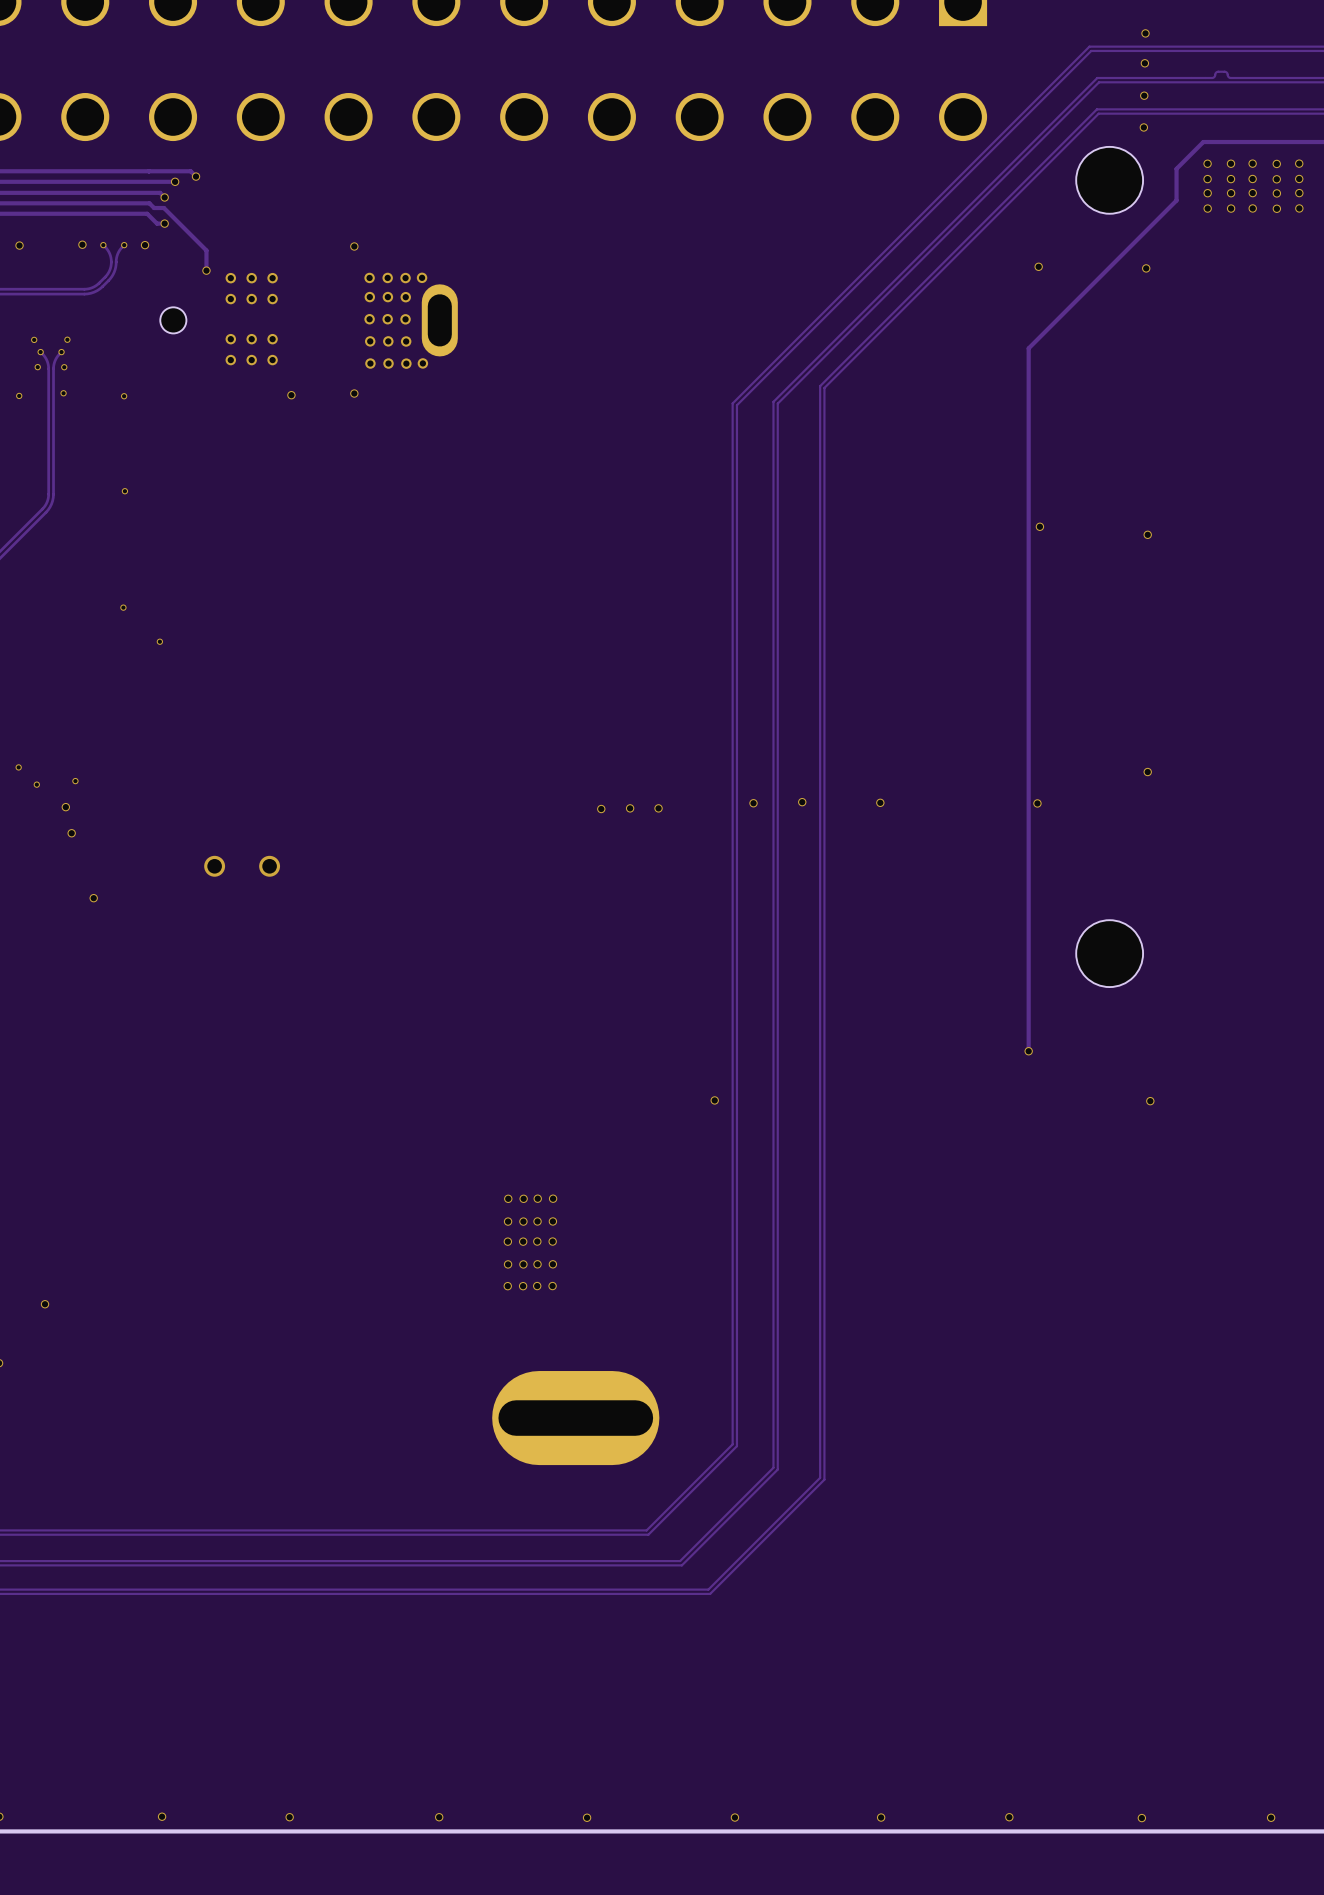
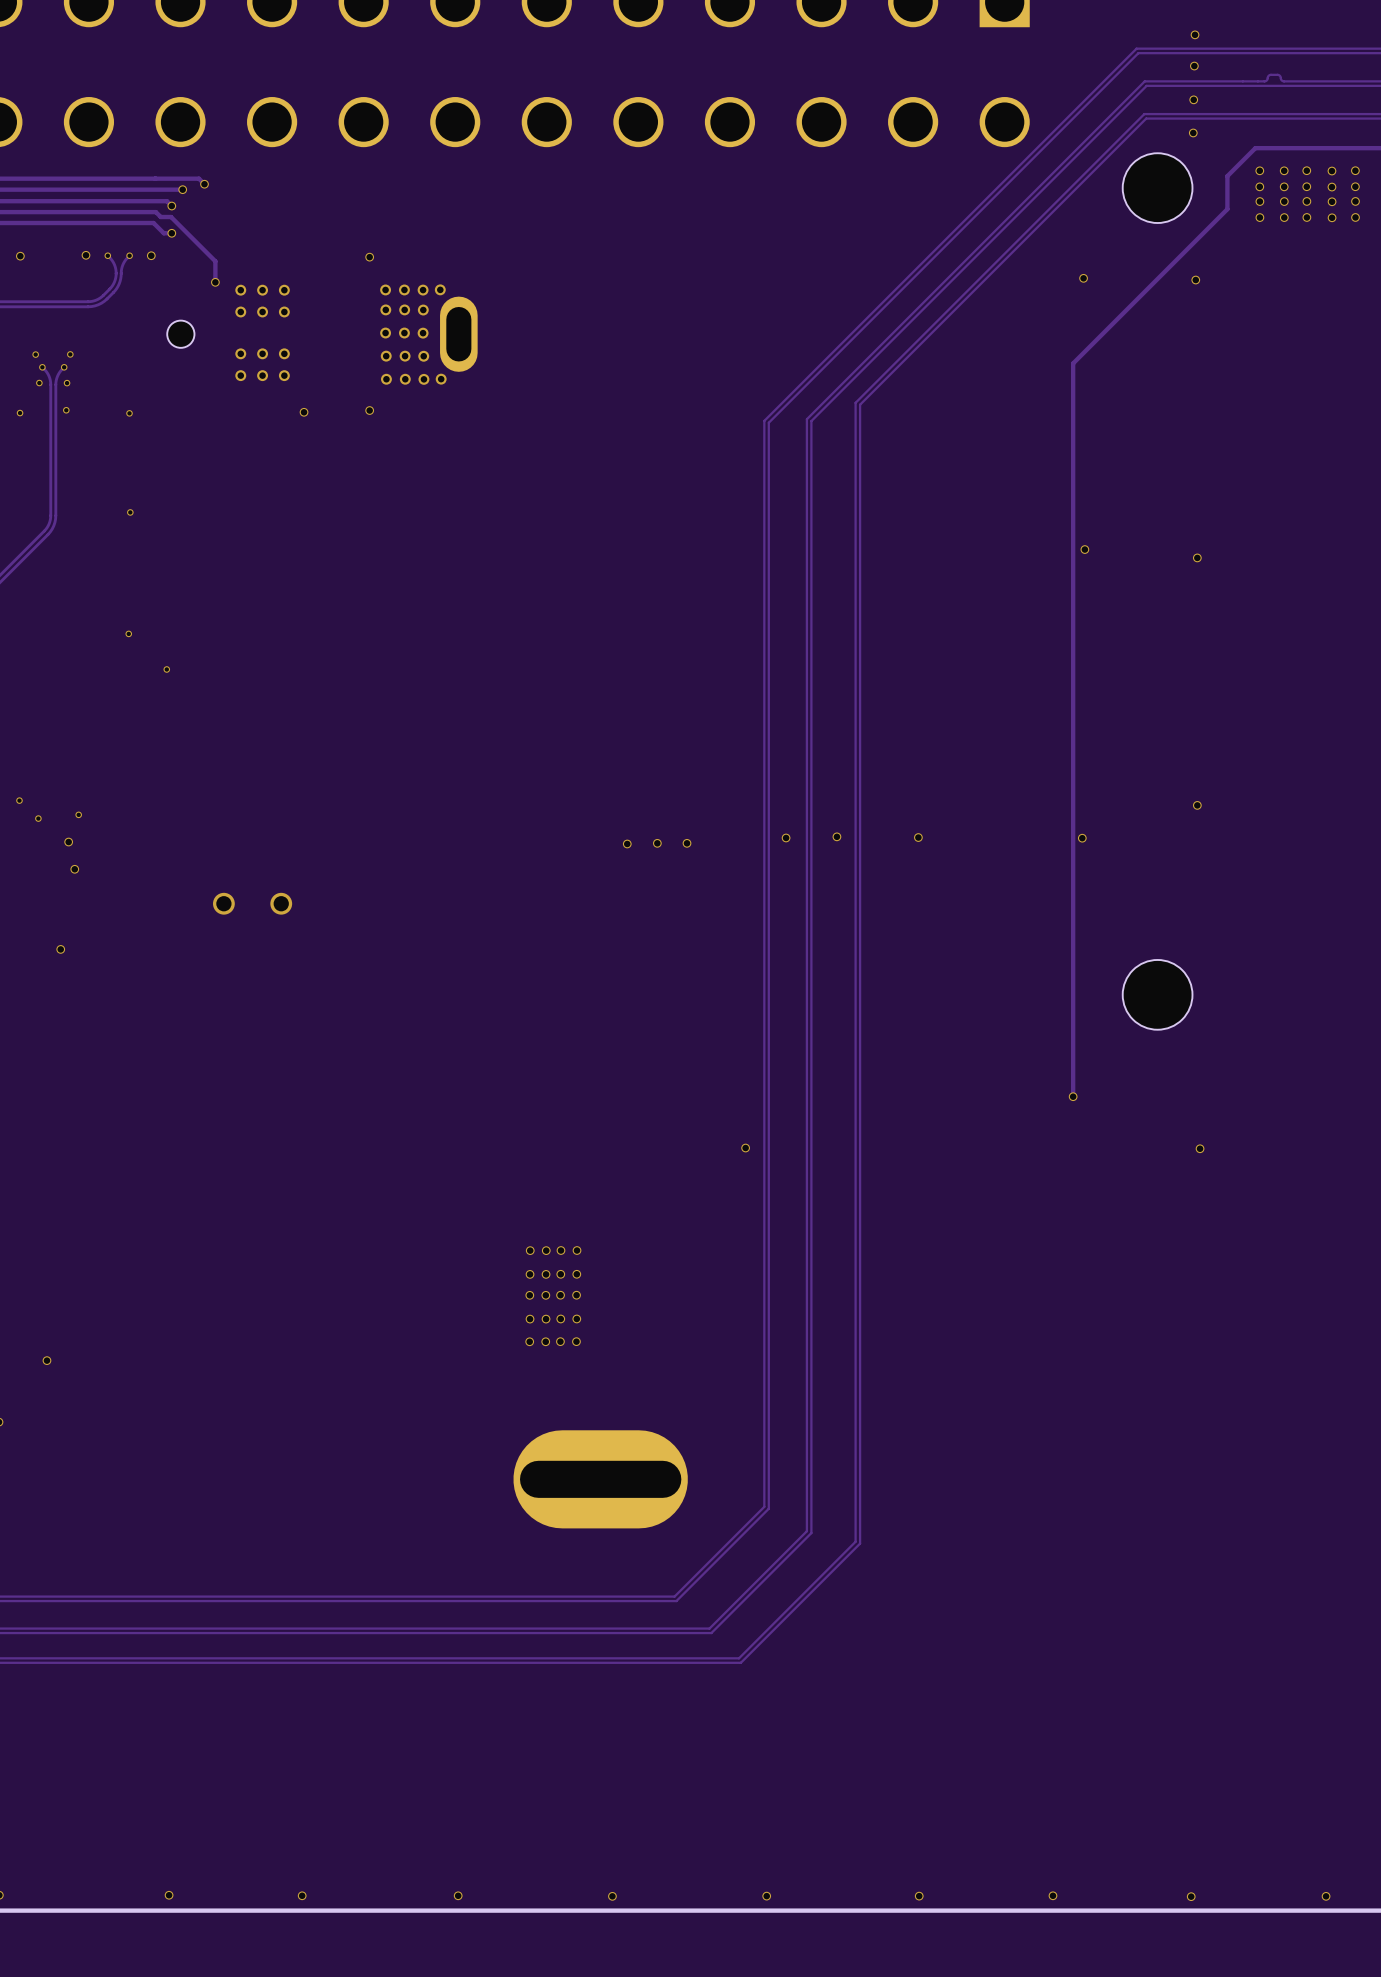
via position: (93, 898) -> (60, 949)

